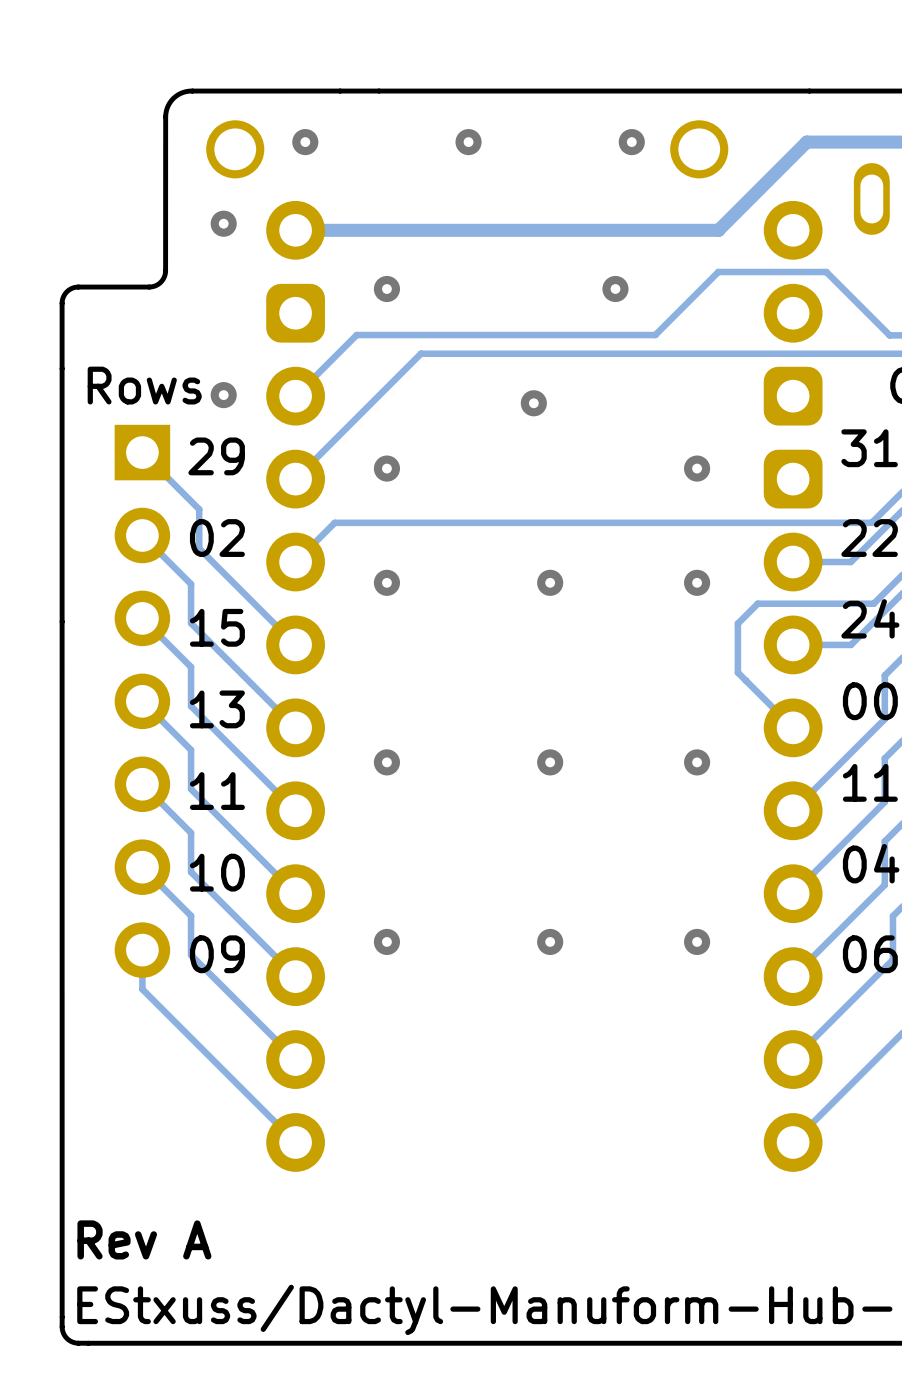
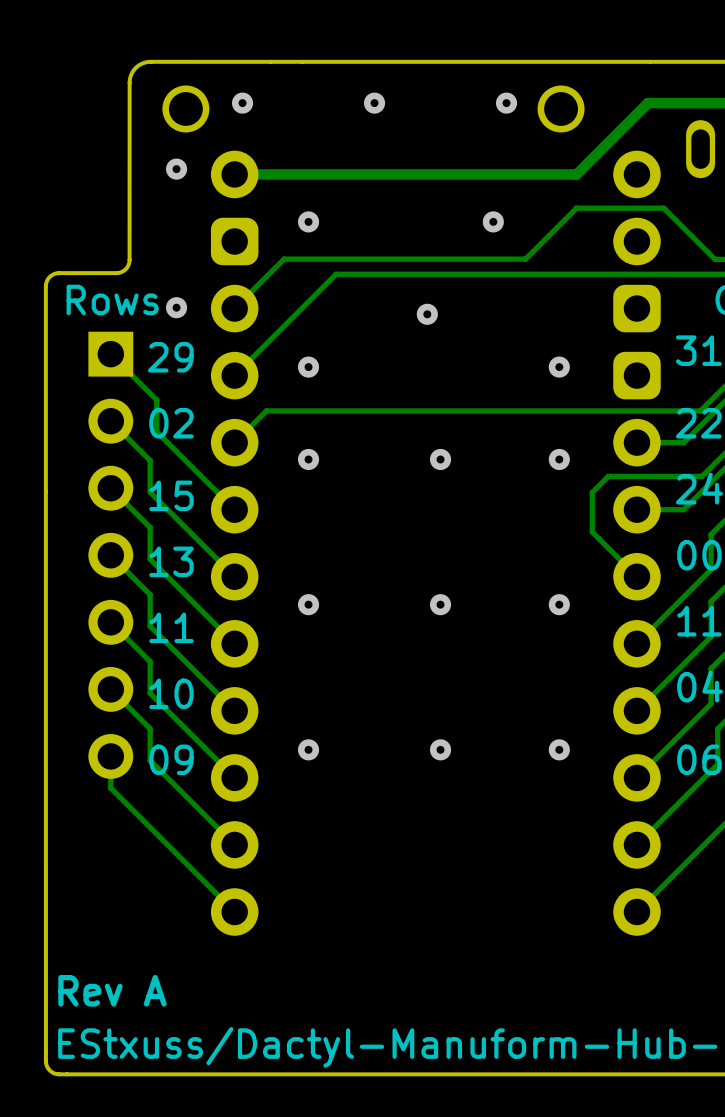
board edge: (165, 116) (164, 276) (159, 283) (151, 286) (76, 287) (66, 291) (62, 301) (62, 368) -> (129, 82) (128, 264) (124, 270) (118, 273) (55, 273) (48, 278) (45, 286)

